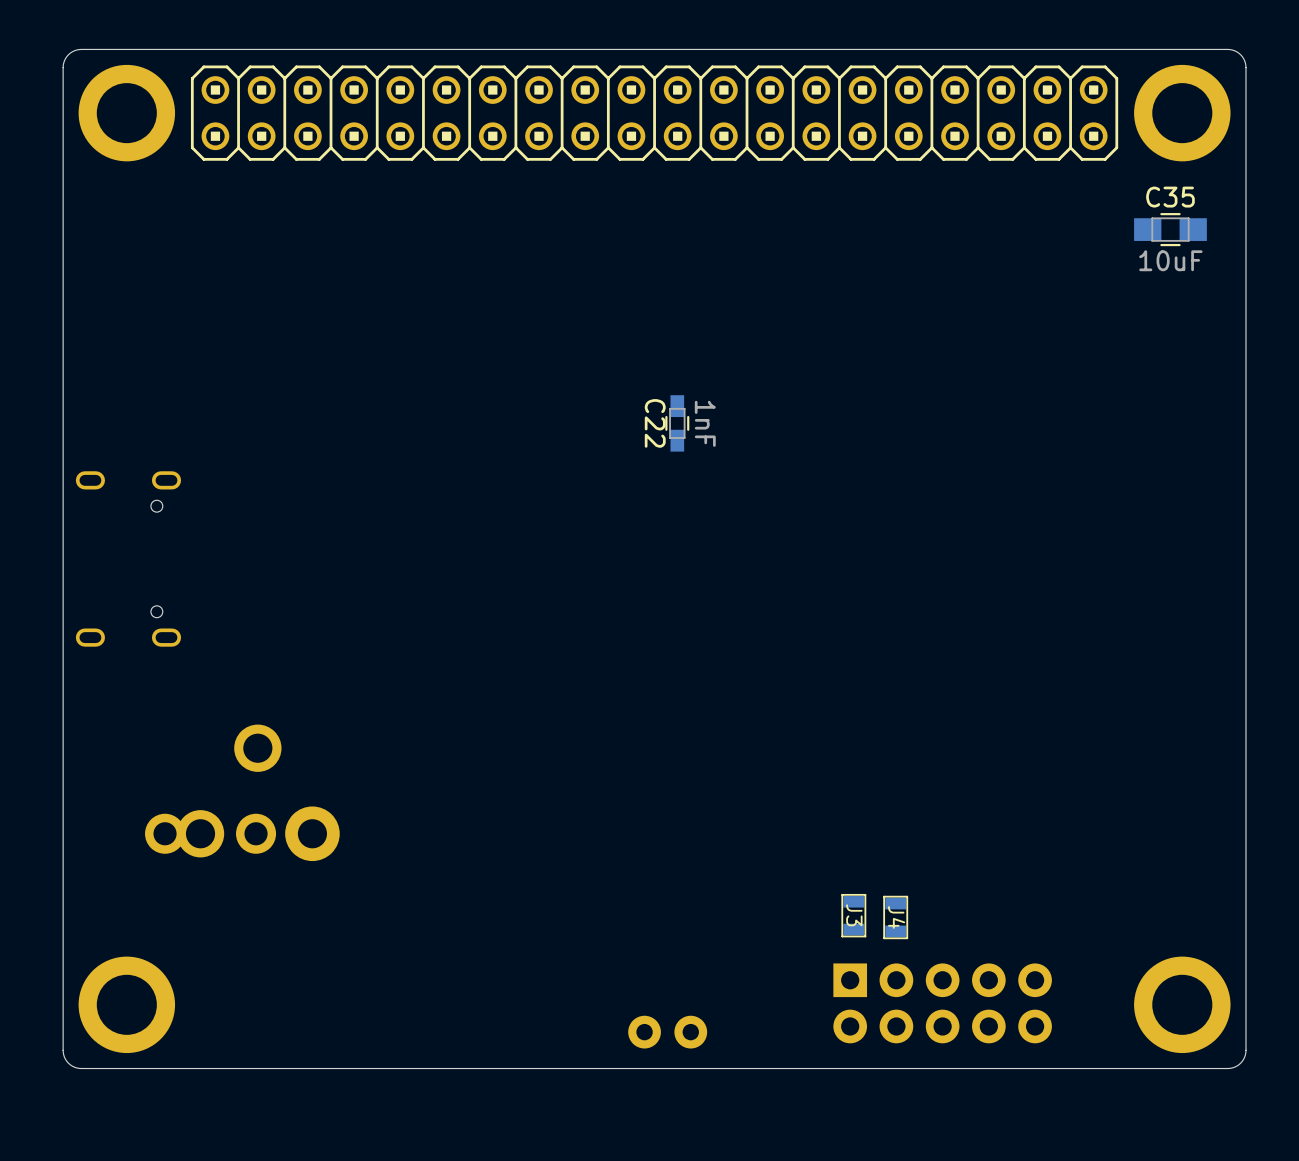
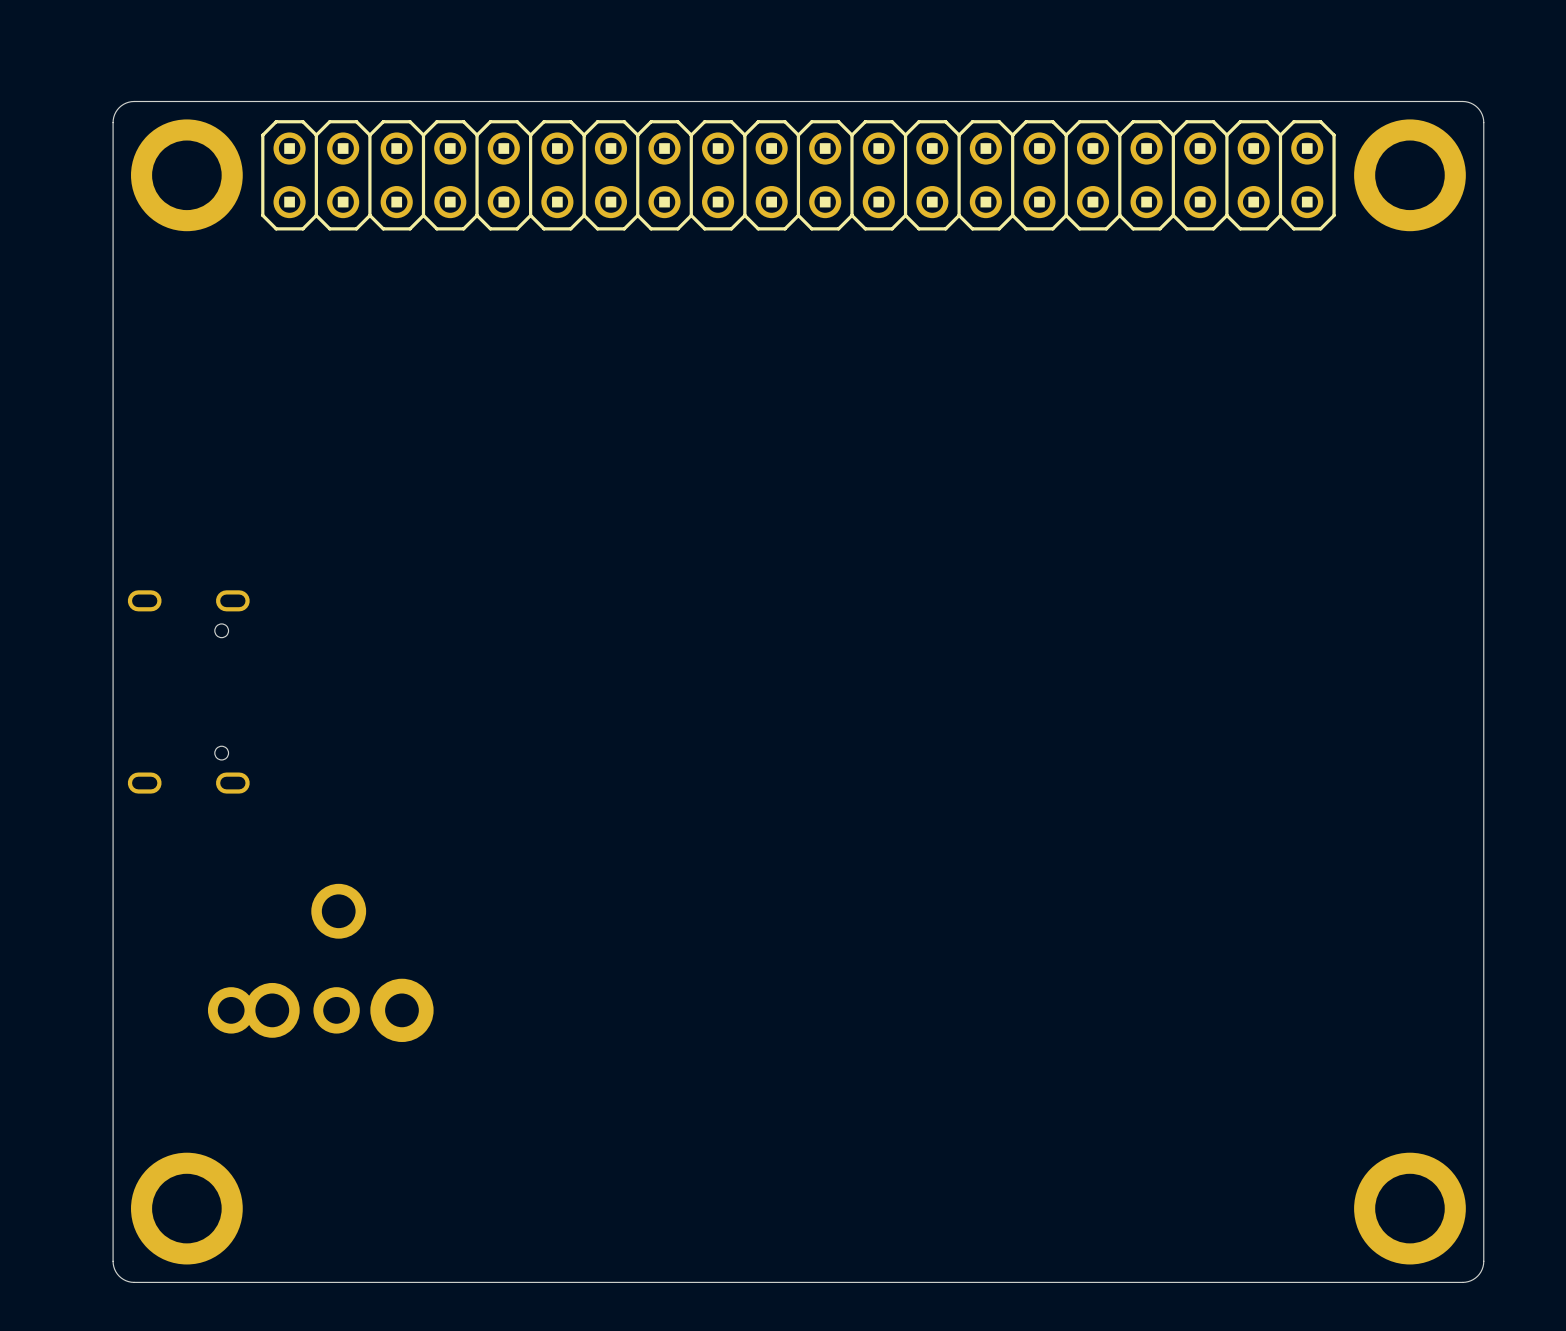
C35: 10uF (1170, 229) -> none
C22: 1nF (677, 423) -> none
J3: (853, 915) -> none
J4: (895, 917) -> none
part: (942, 1003) -> none
part: (667, 1032) -> none

